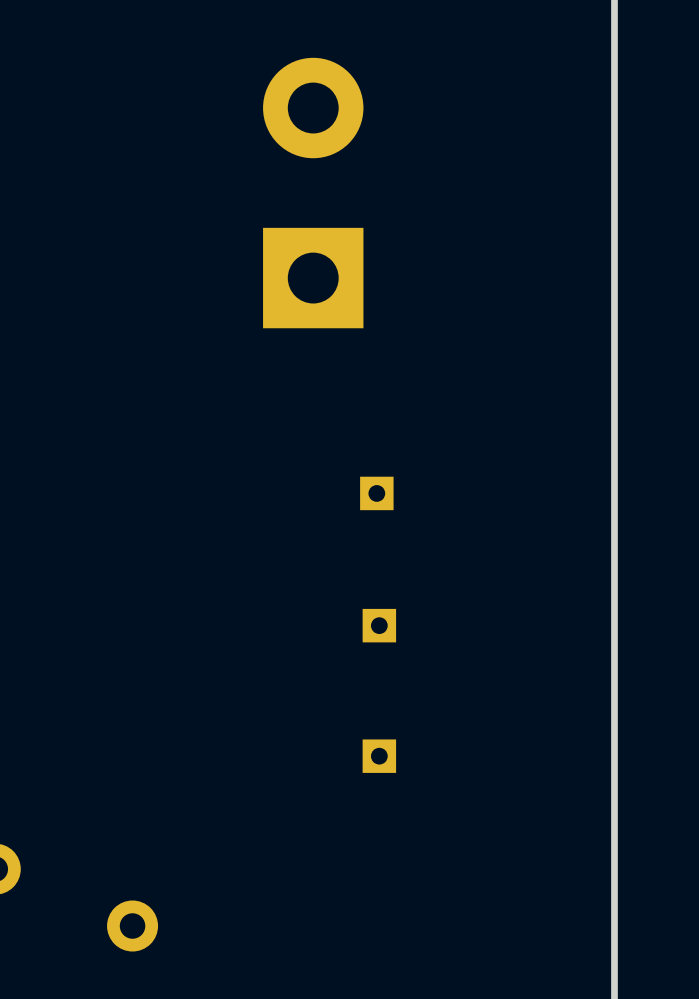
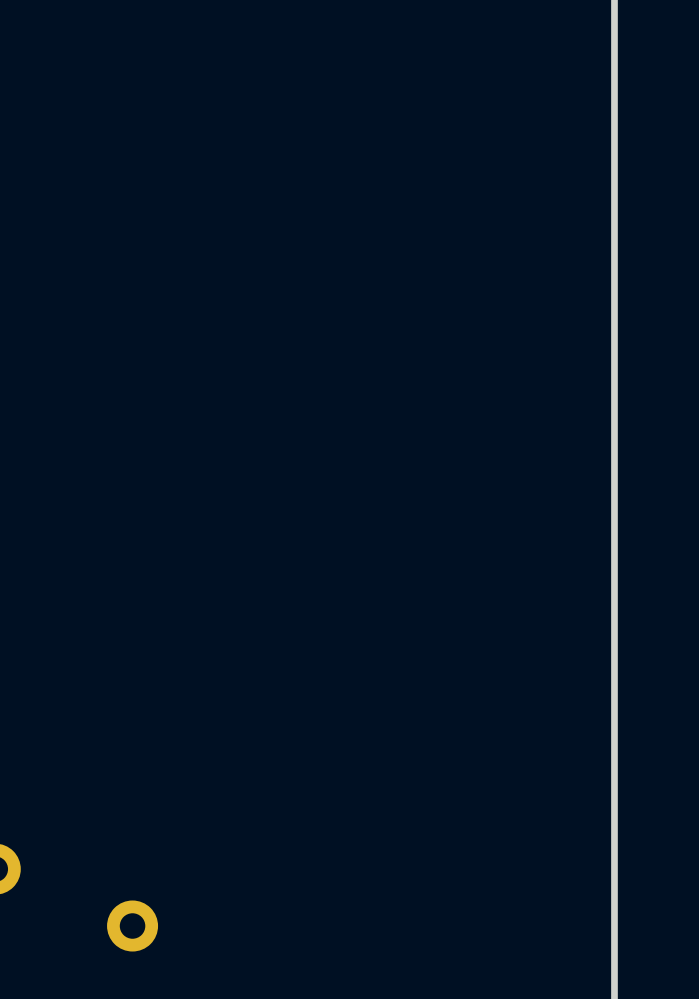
part: (313, 193) -> none
part: (376, 493) -> none
part: (379, 625) -> none
part: (379, 756) -> none

